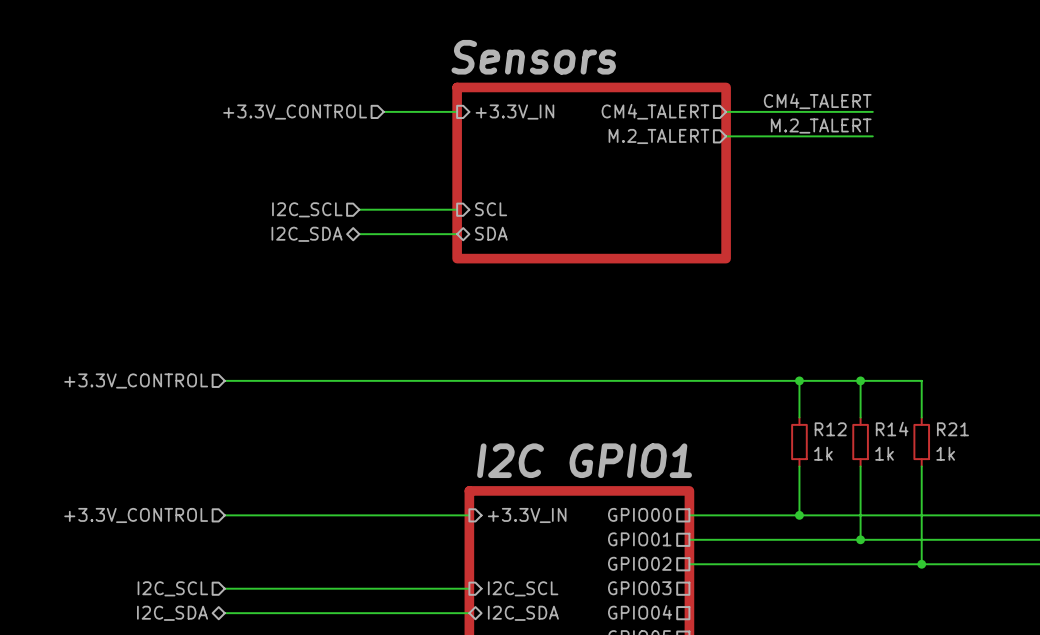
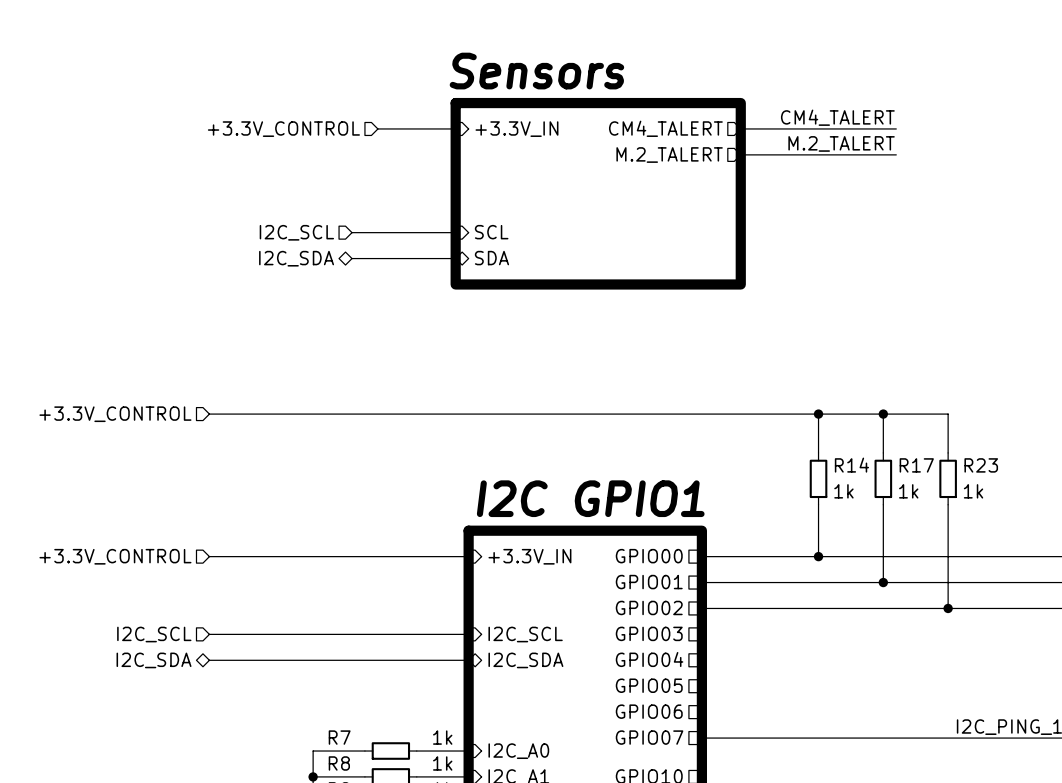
R12 name: R12 (830, 429) -> R14 (851, 465)
R14 name: R14 (892, 429) -> R17 (916, 465)
R21 name: R21 (952, 429) -> R23 (981, 465)

